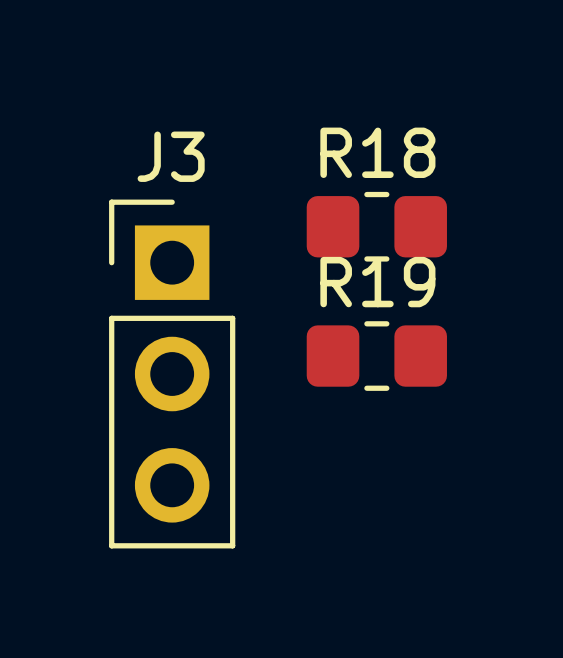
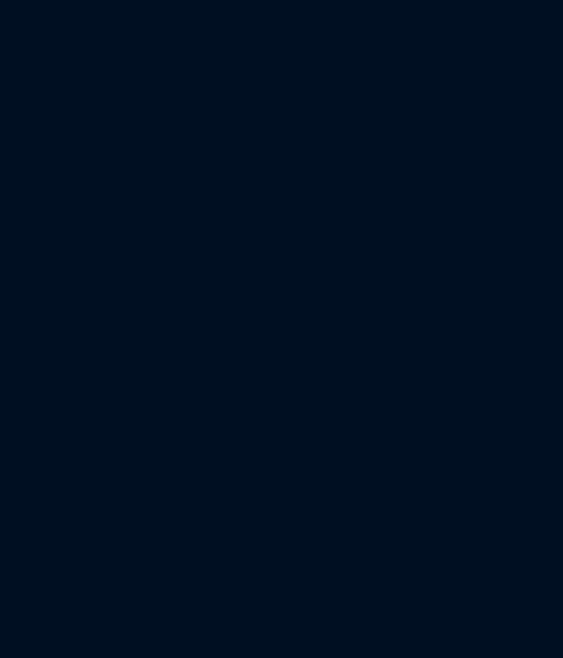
R18: (376, 226) -> none
R19: (376, 356) -> none
J3: (172, 374) -> none

